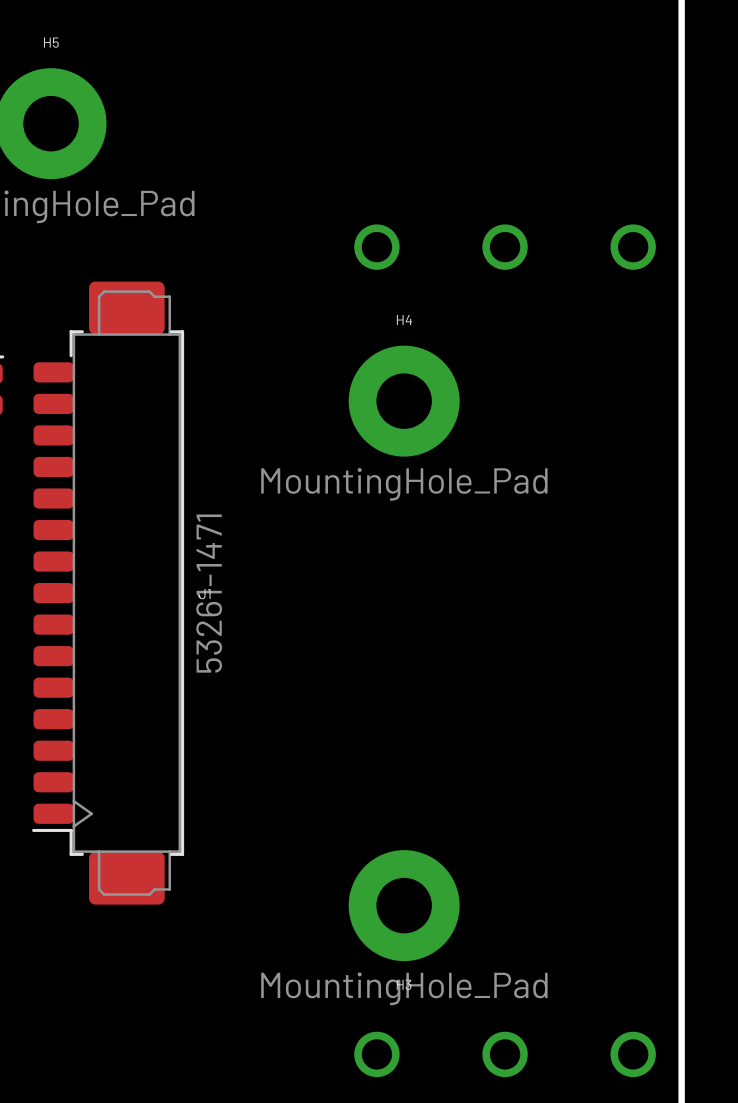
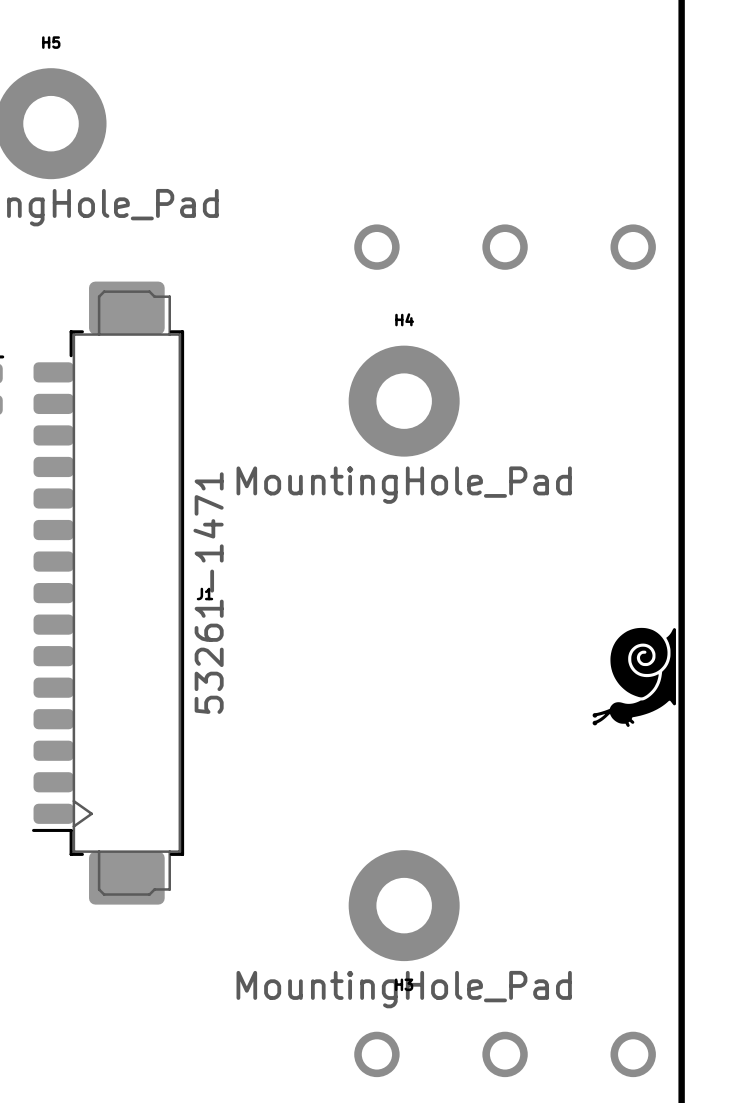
drawing: none -> [592, 627, 676, 727]

